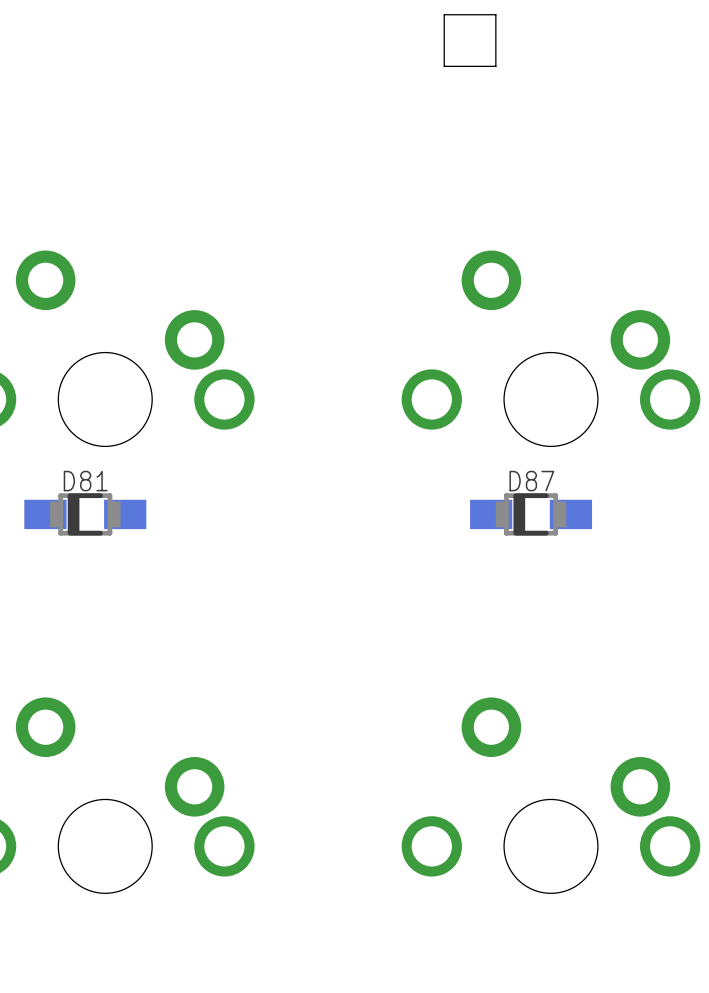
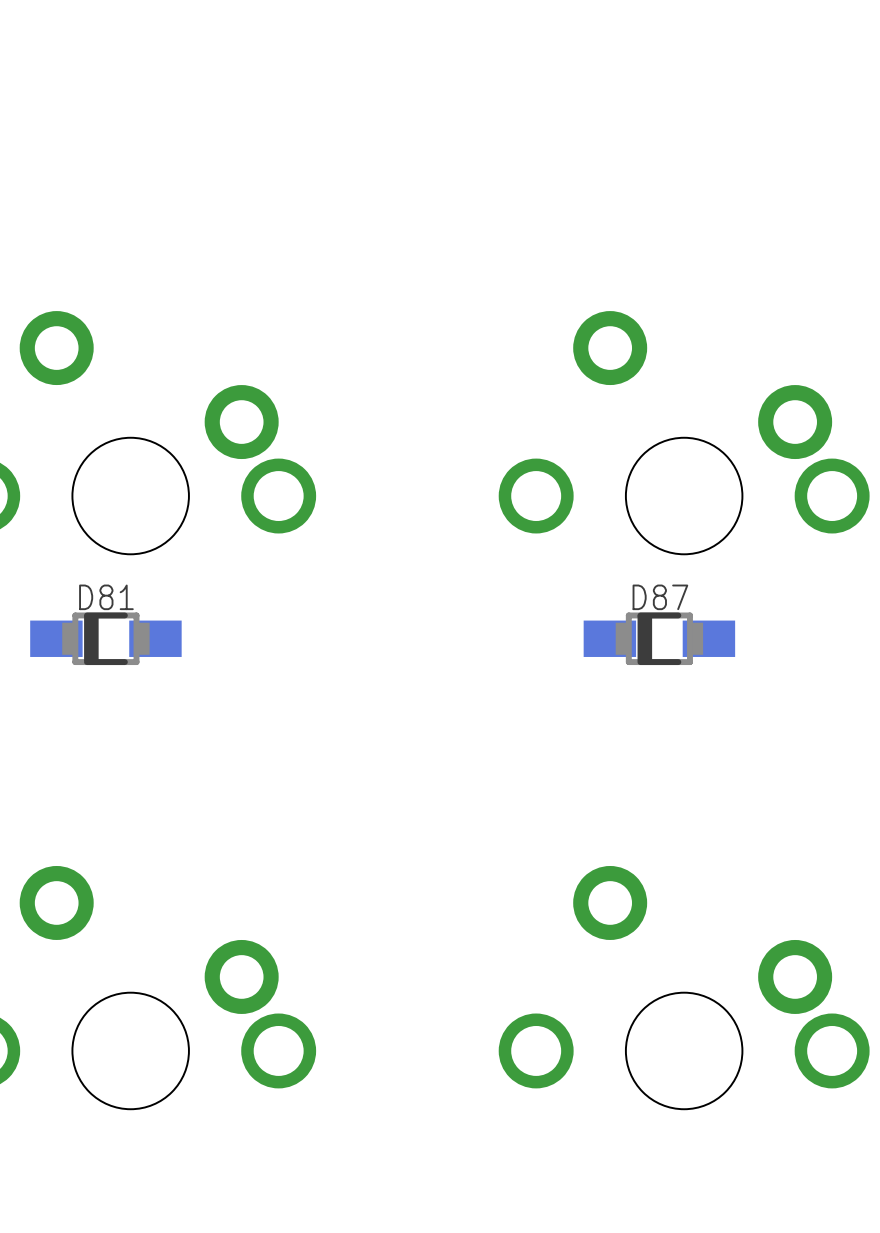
part: (470, 40) -> none

